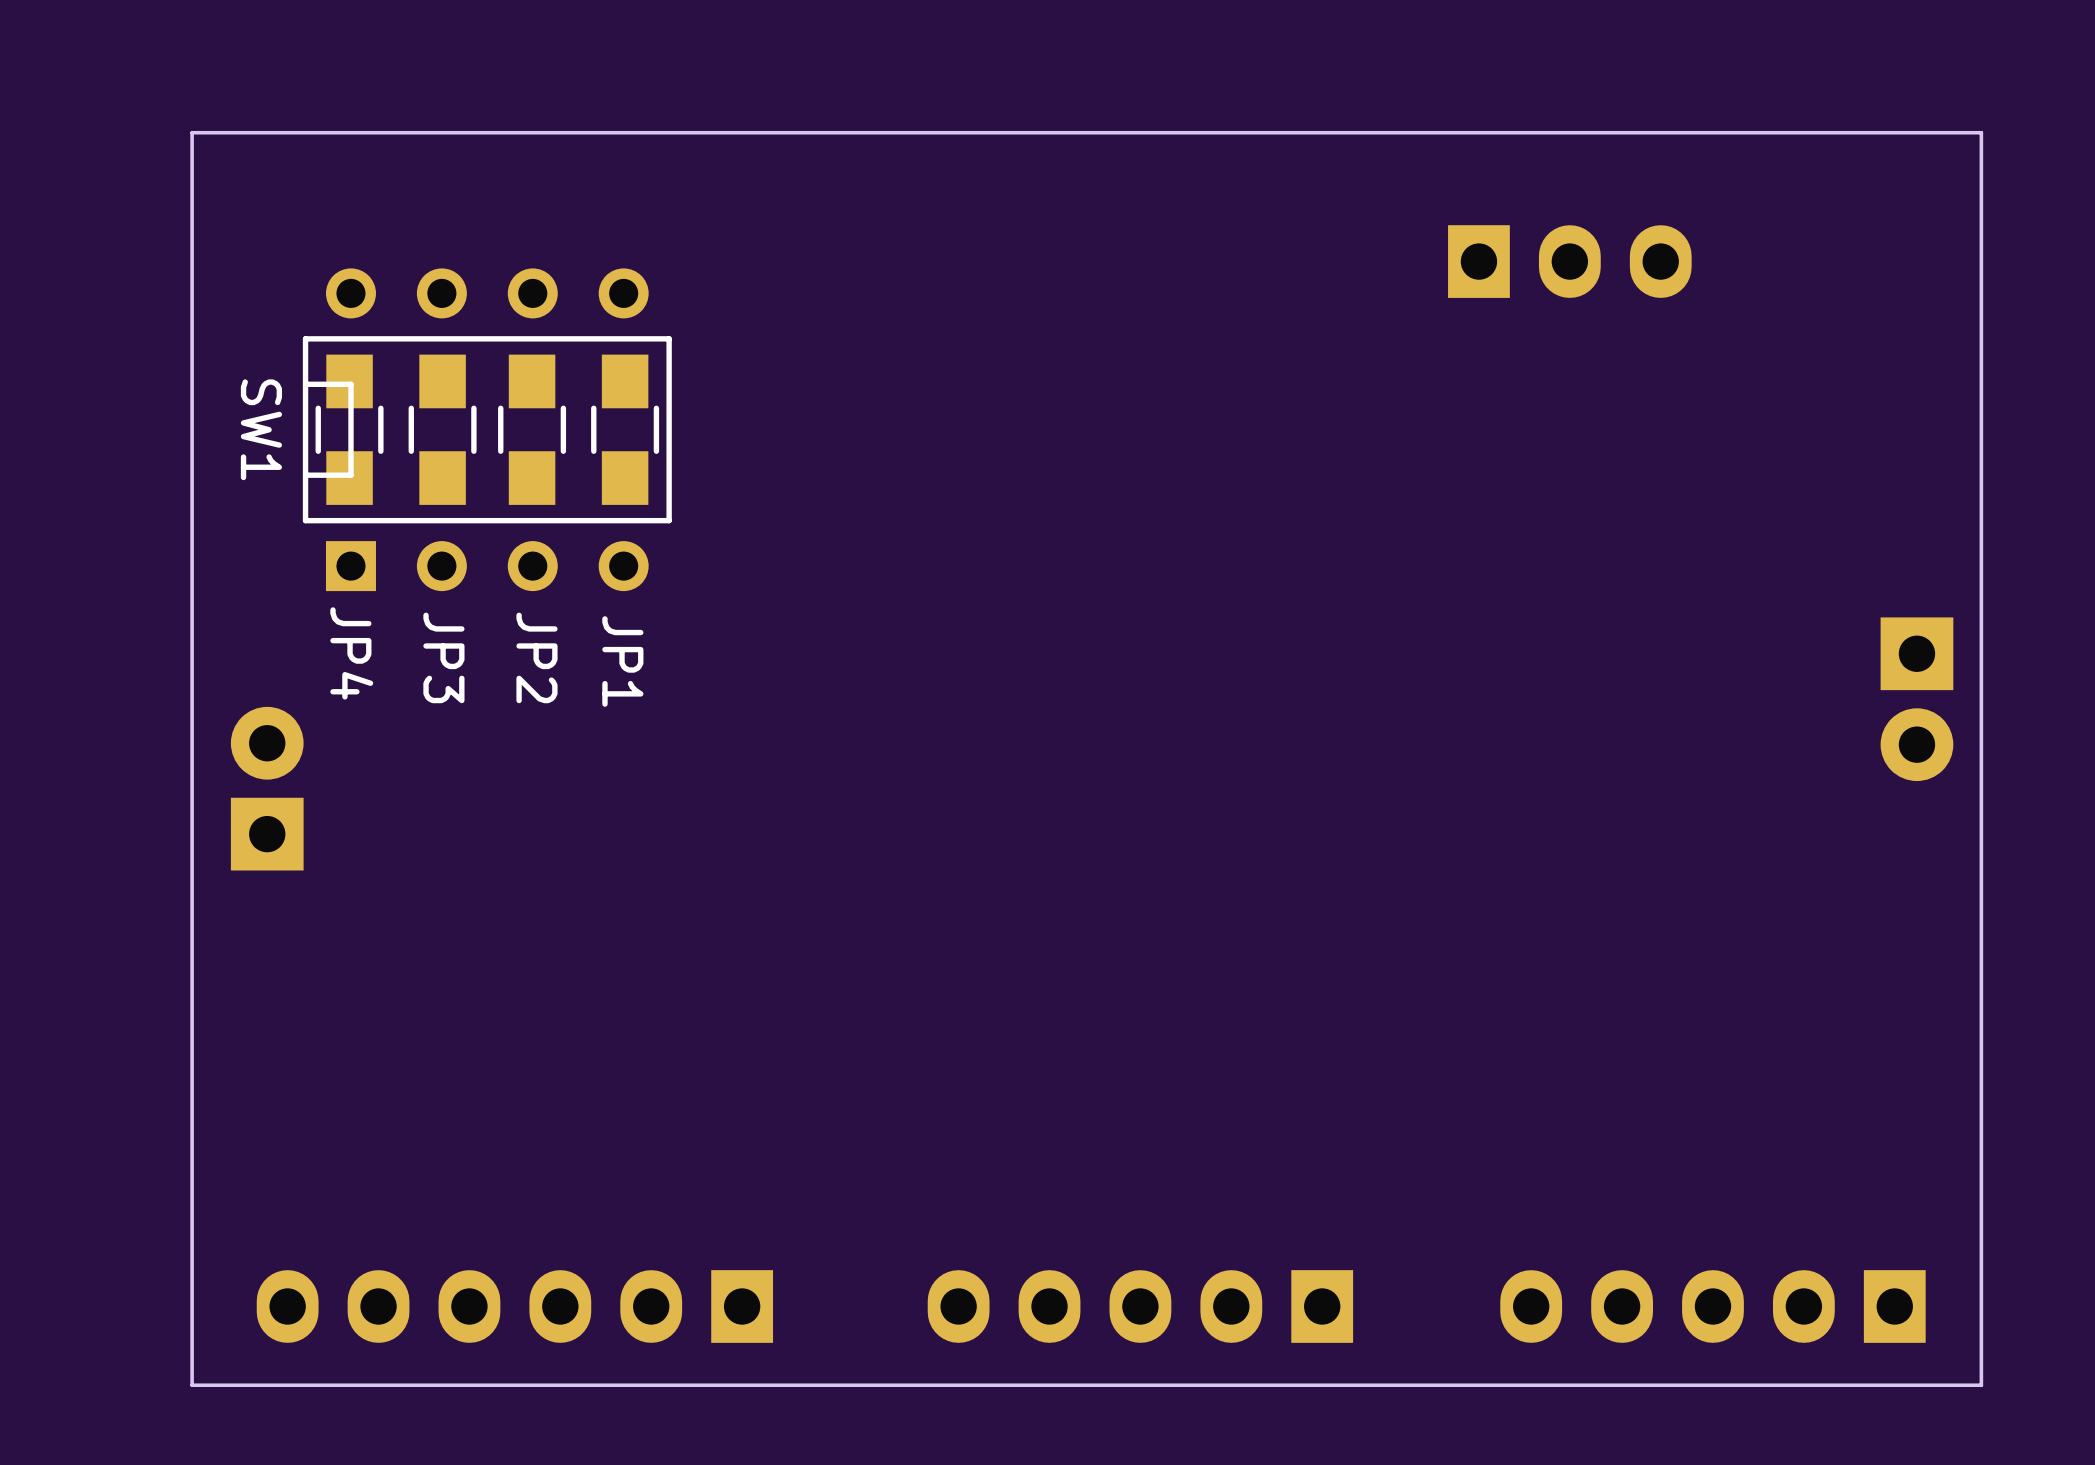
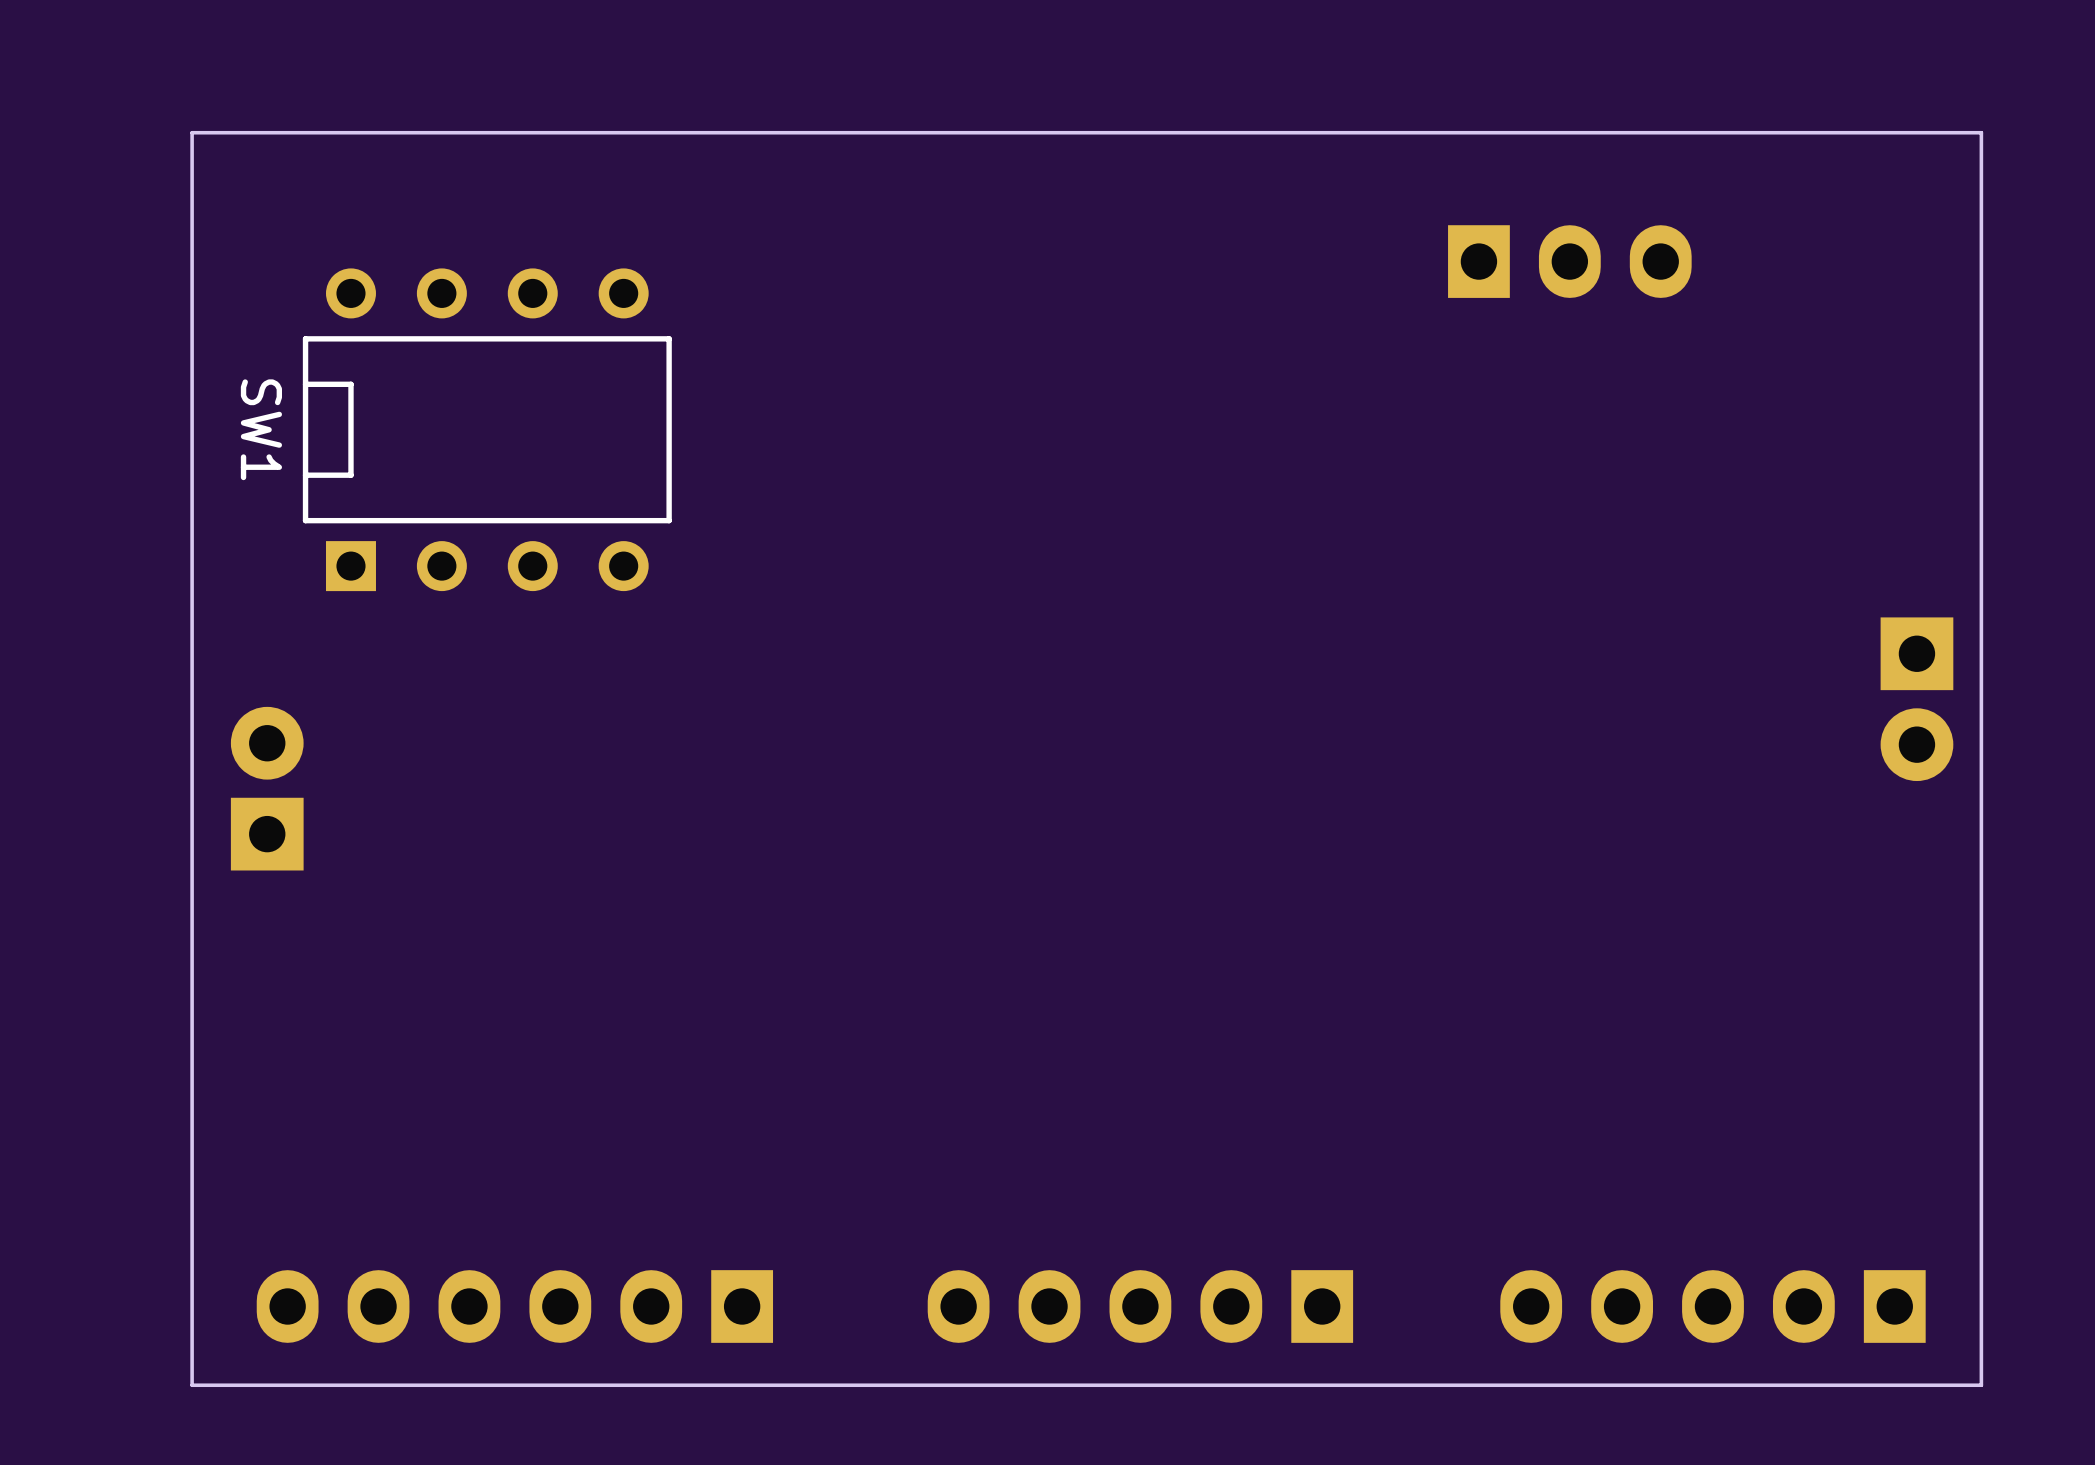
JP4: (349, 429) -> none
JP3: (442, 429) -> none
JP2: (532, 429) -> none
JP1: (625, 429) -> none

